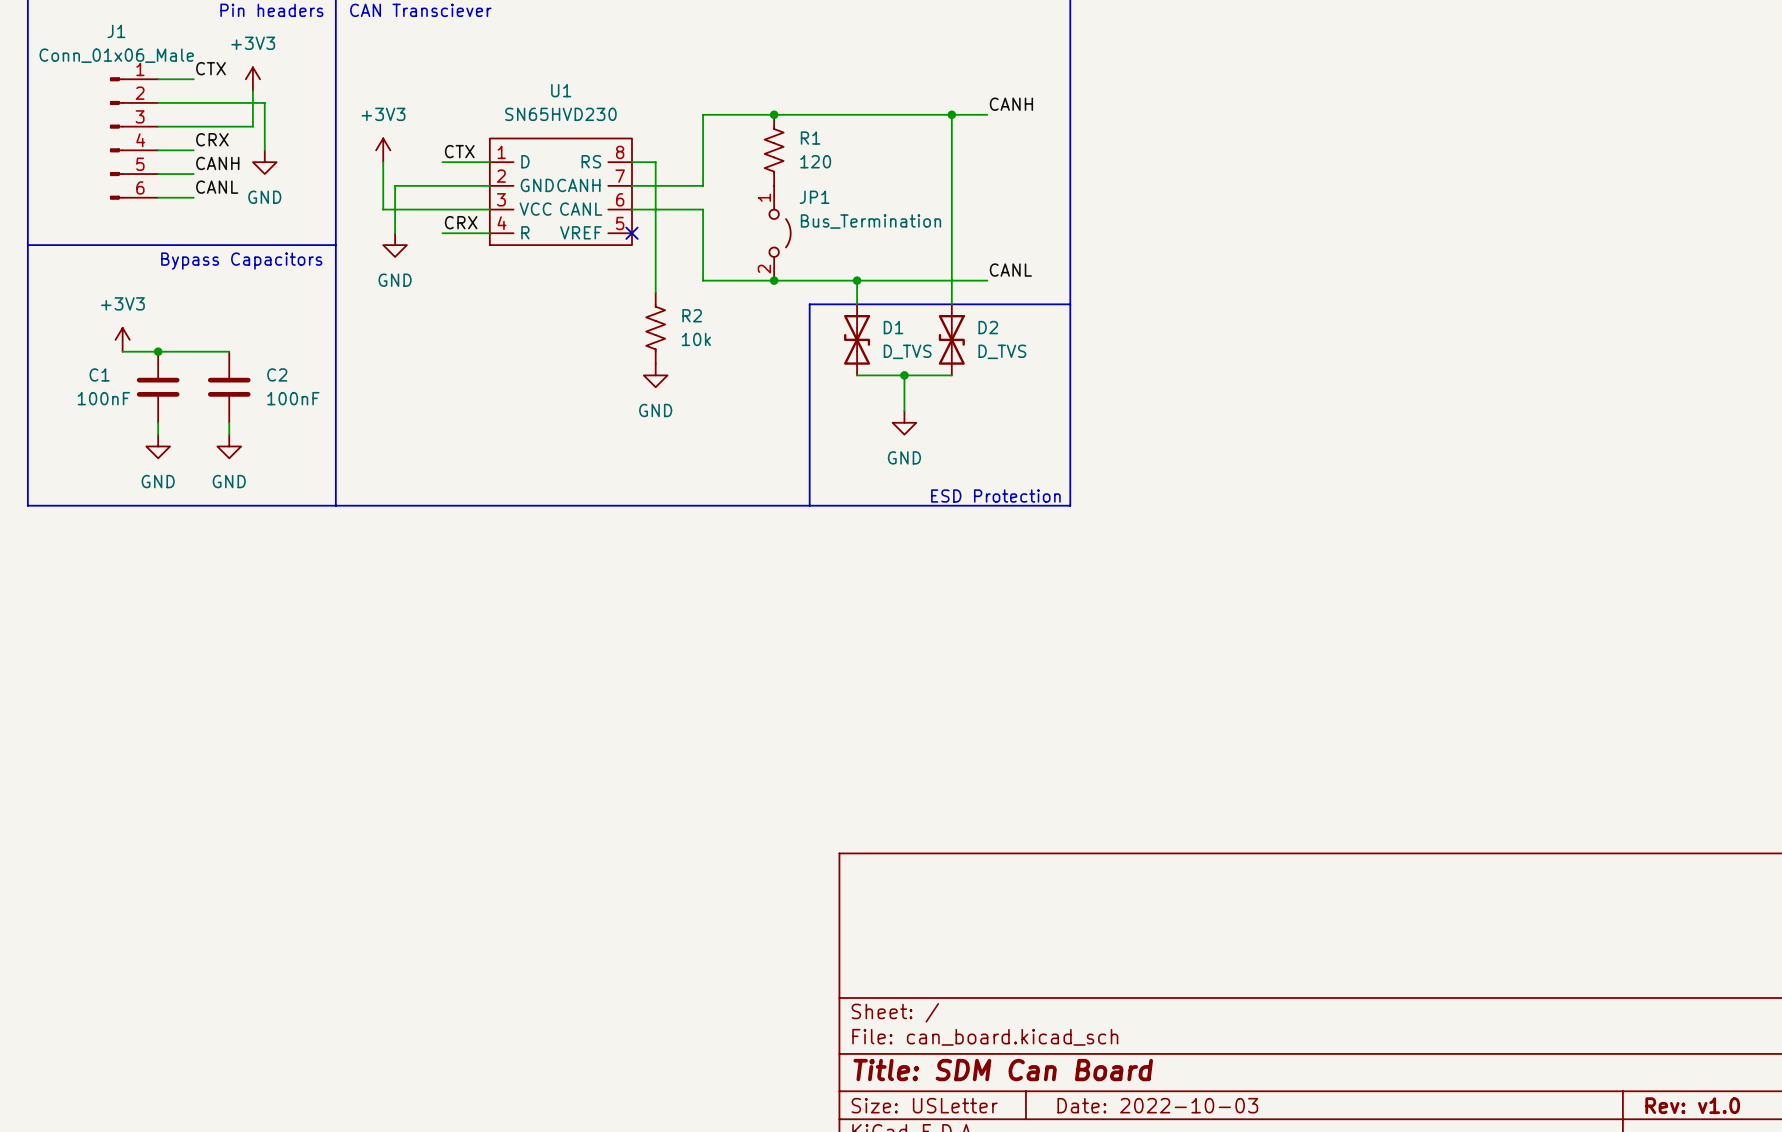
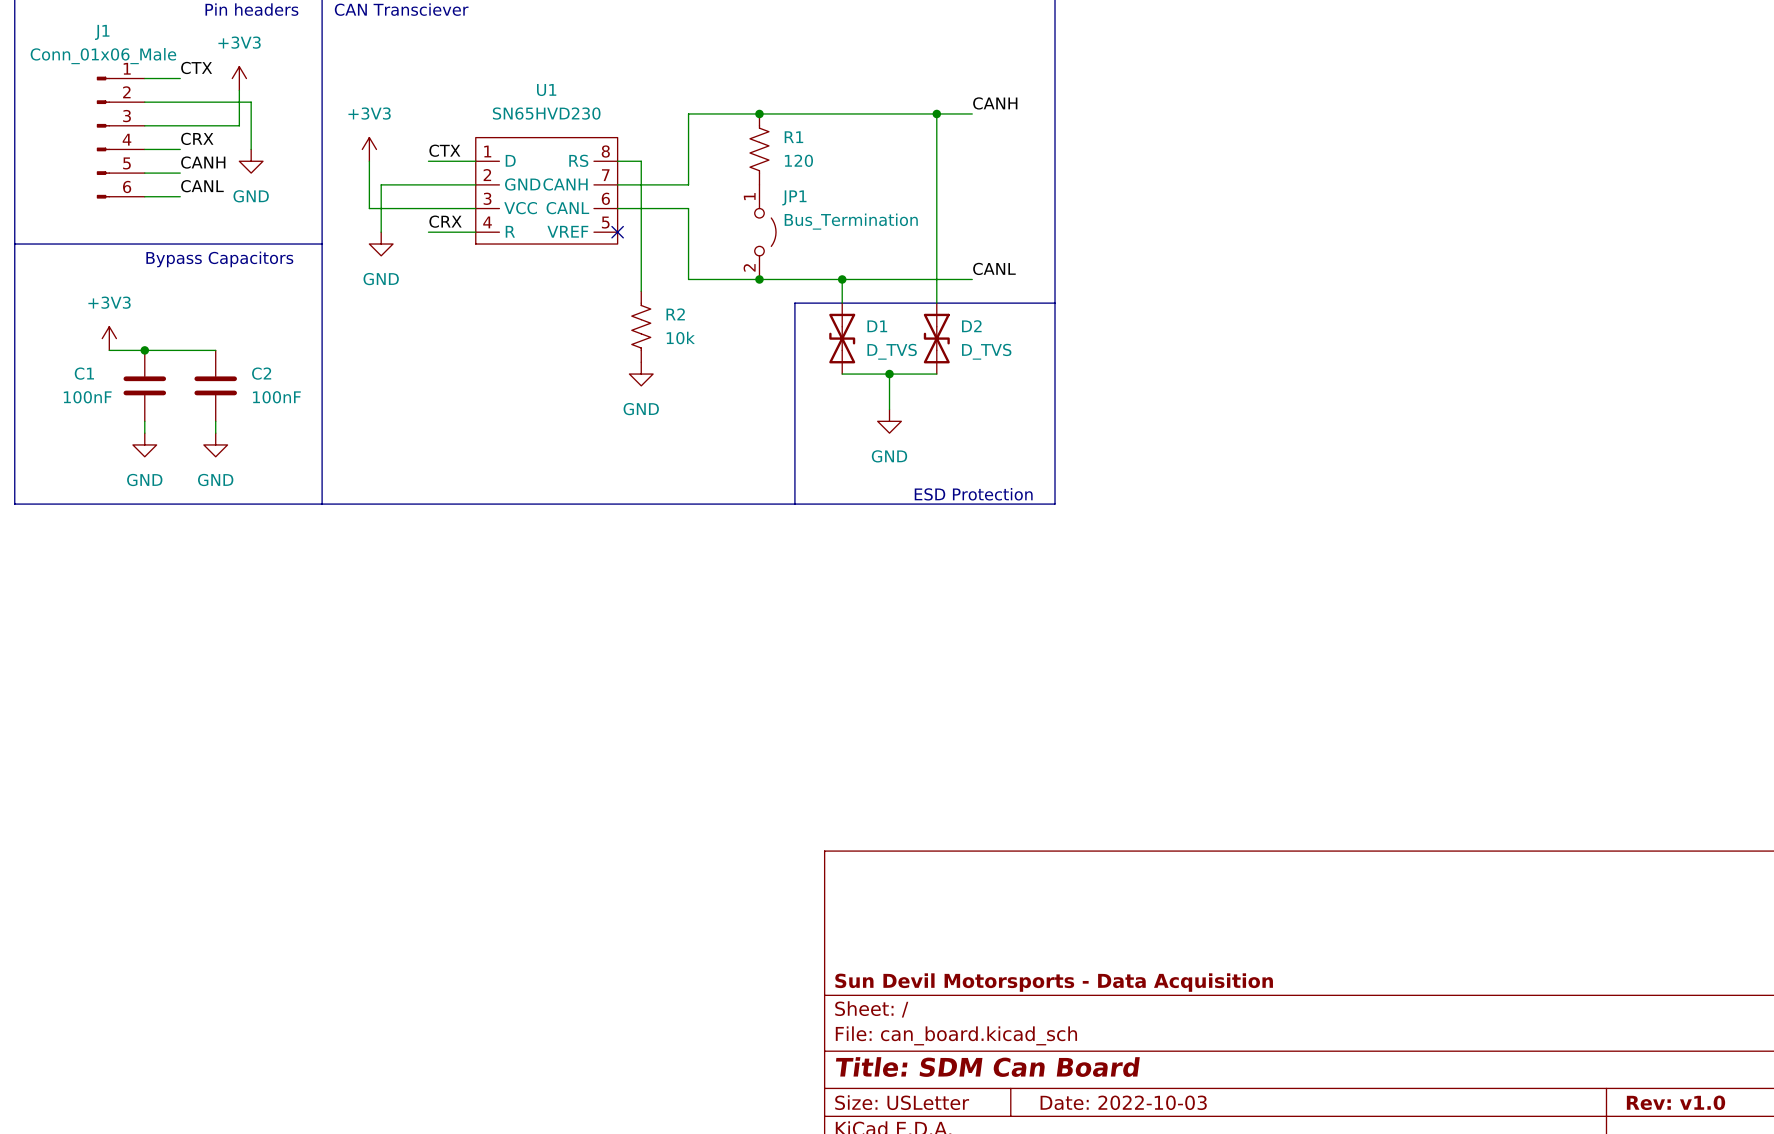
title block: none -> Sun Devil Motorsports - Data Acquisition (1054, 982)

